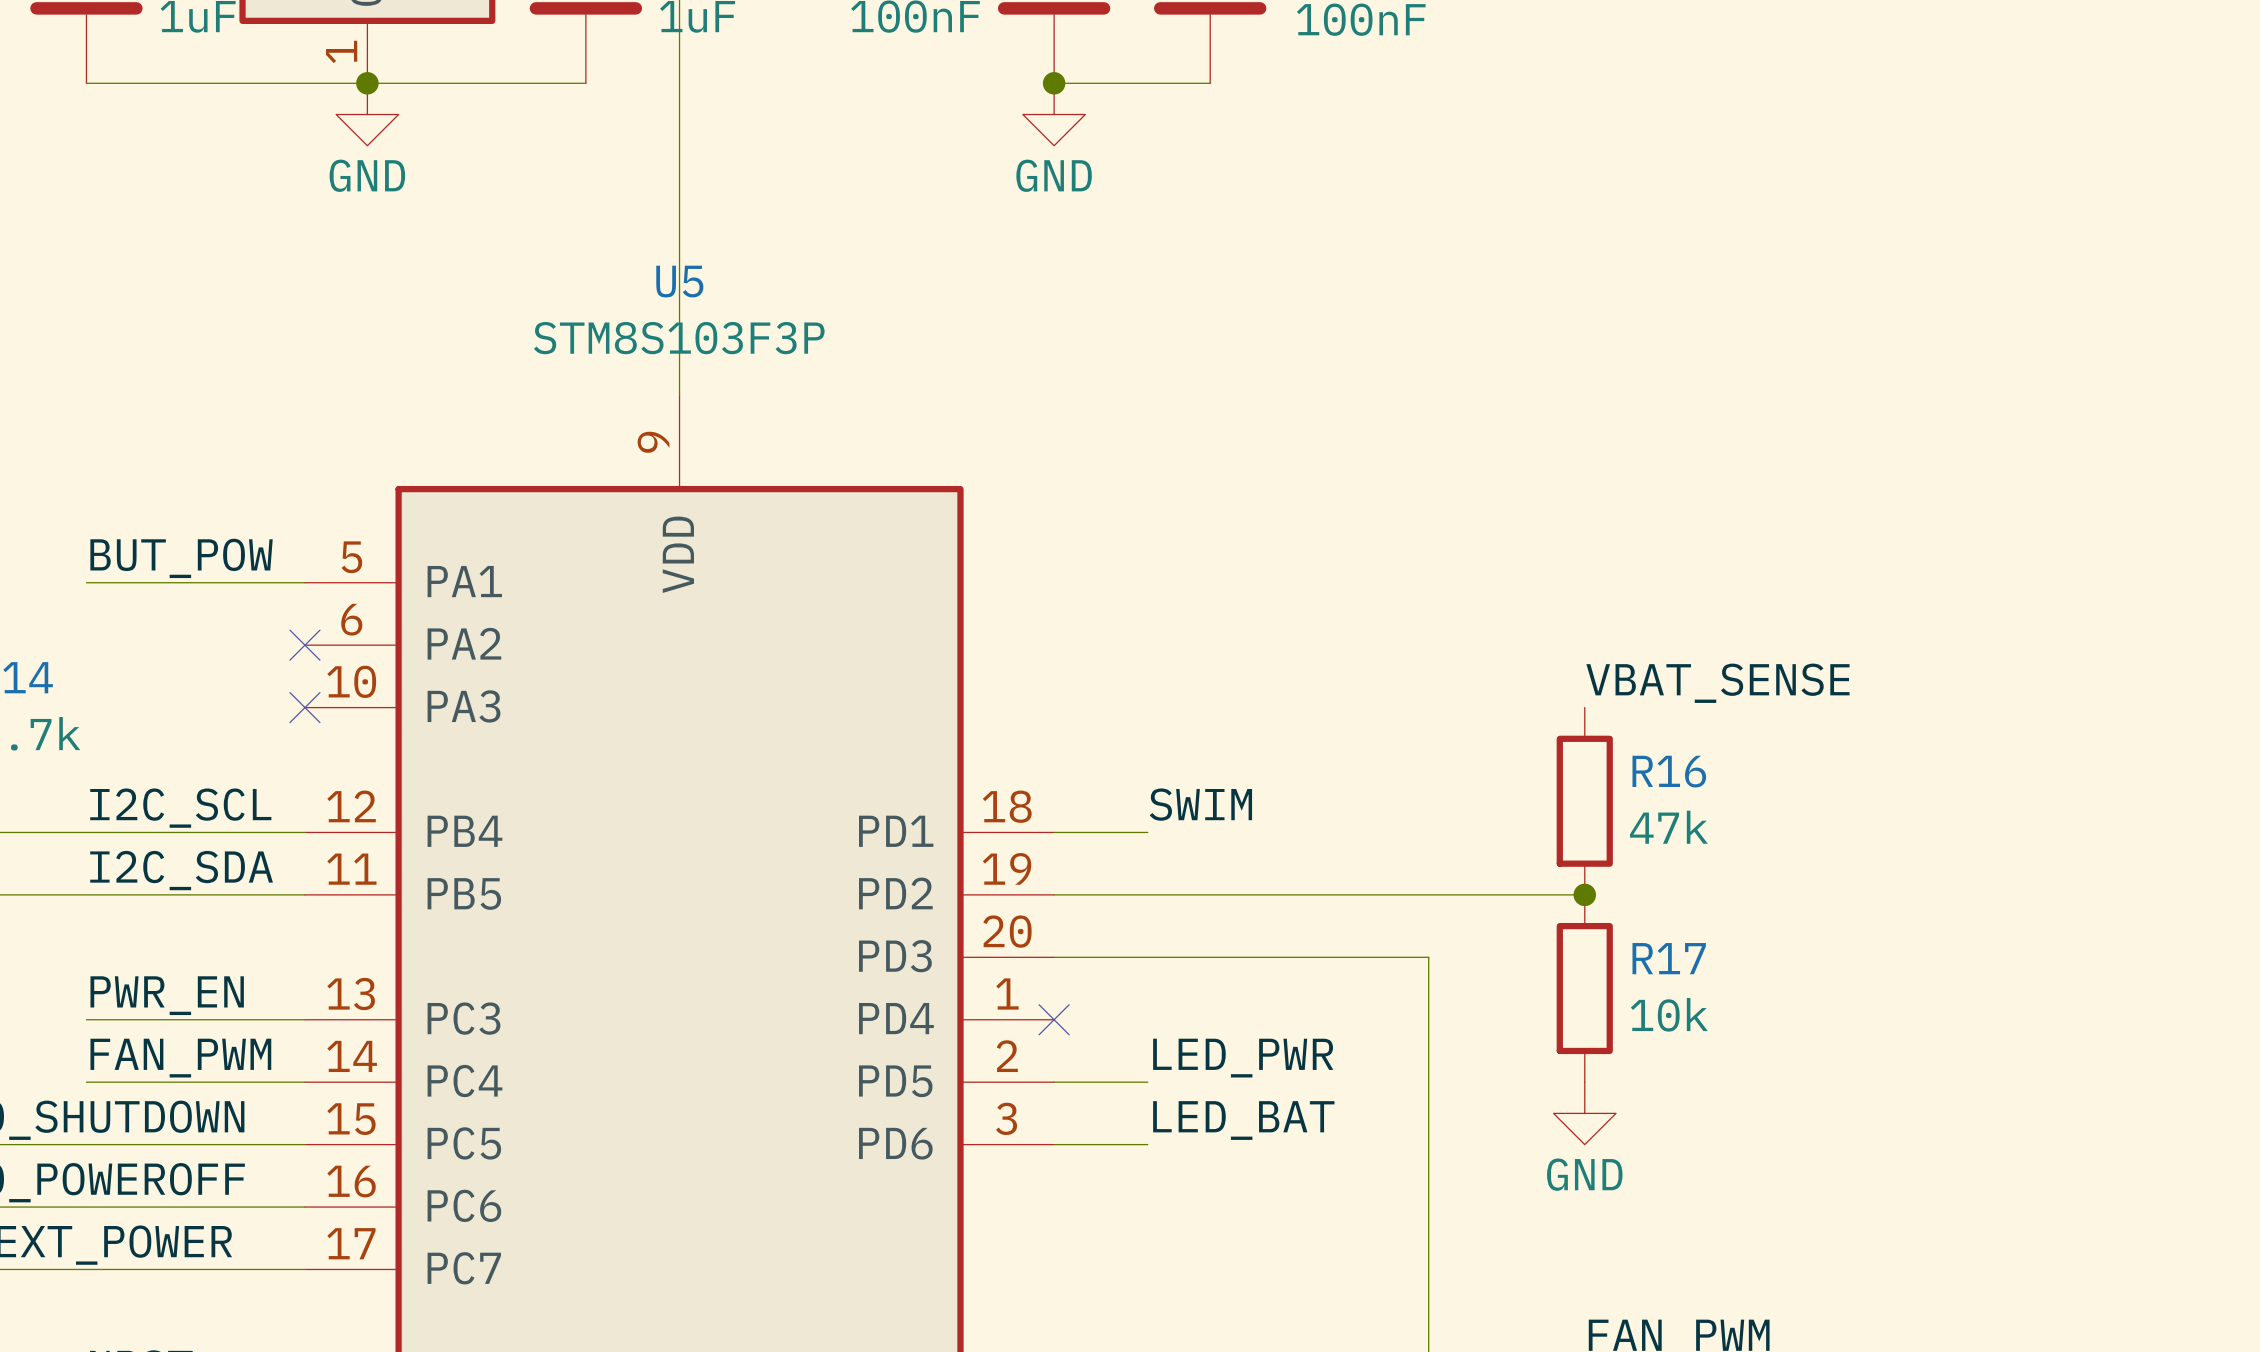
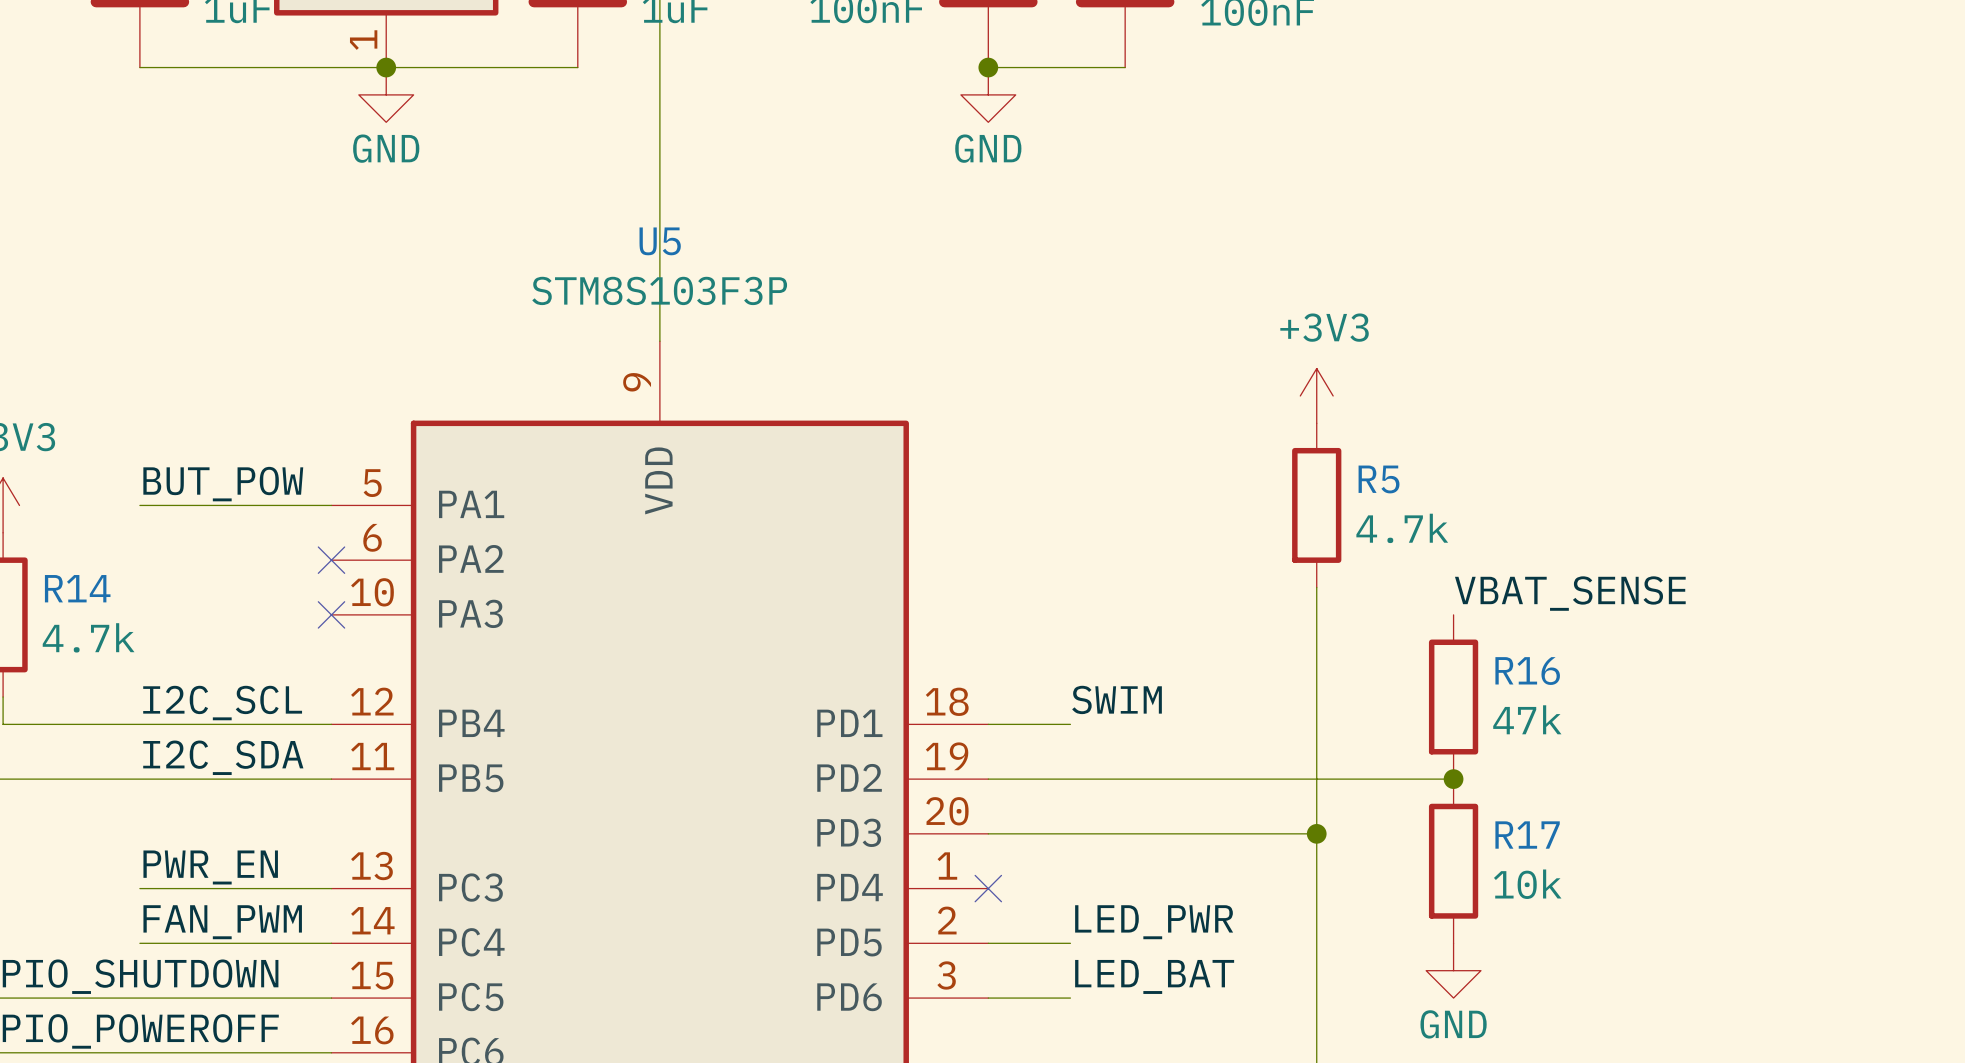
power symbol: none -> +3V3 (1316, 395)
R5: none -> 4.7k (1316, 505)
wire: none -> (1316, 587) (1316, 833)
junction: none -> (1316, 833)

